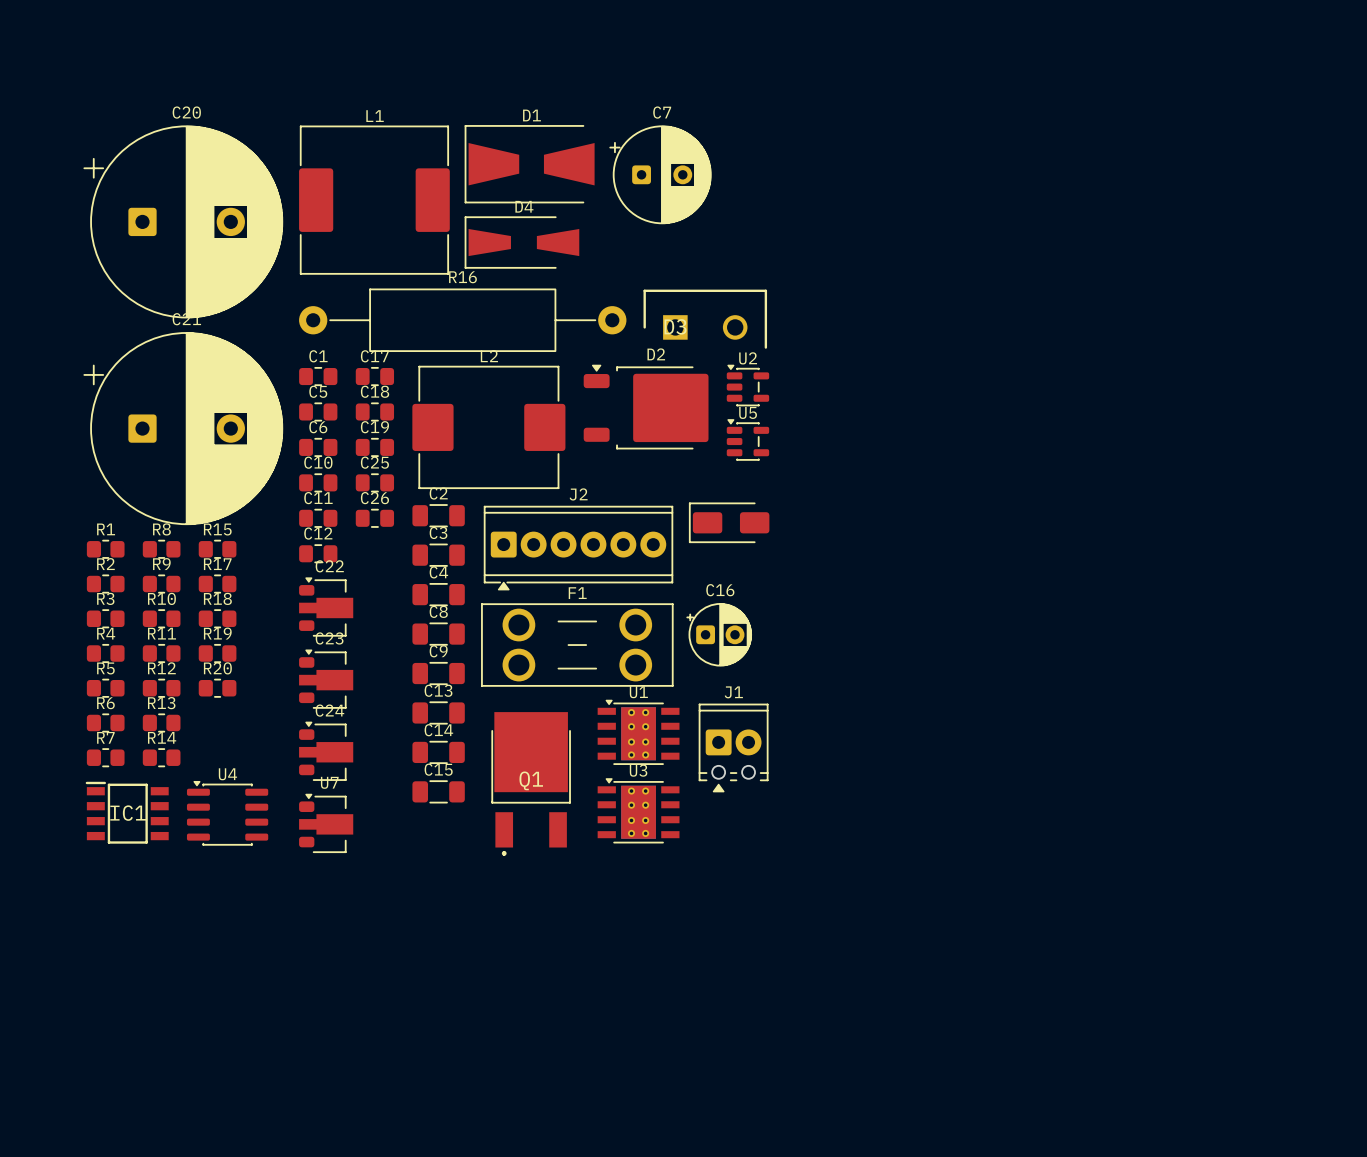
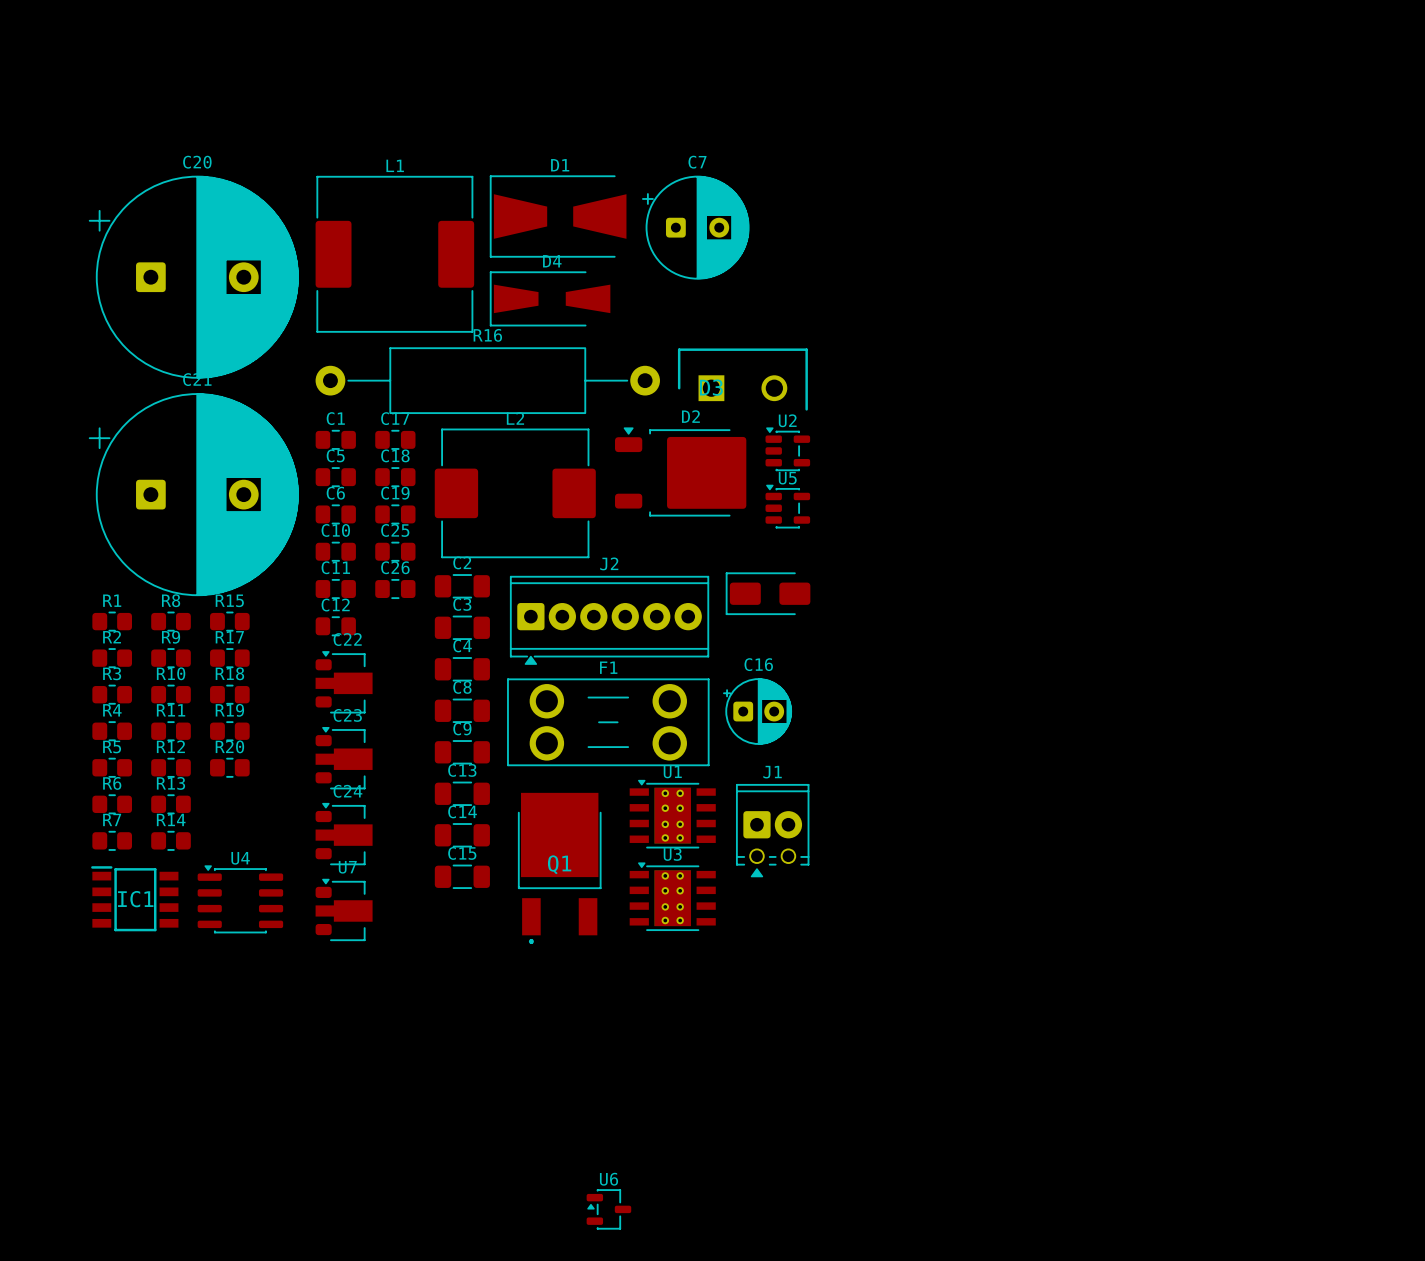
U6: none -> (608, 1209)

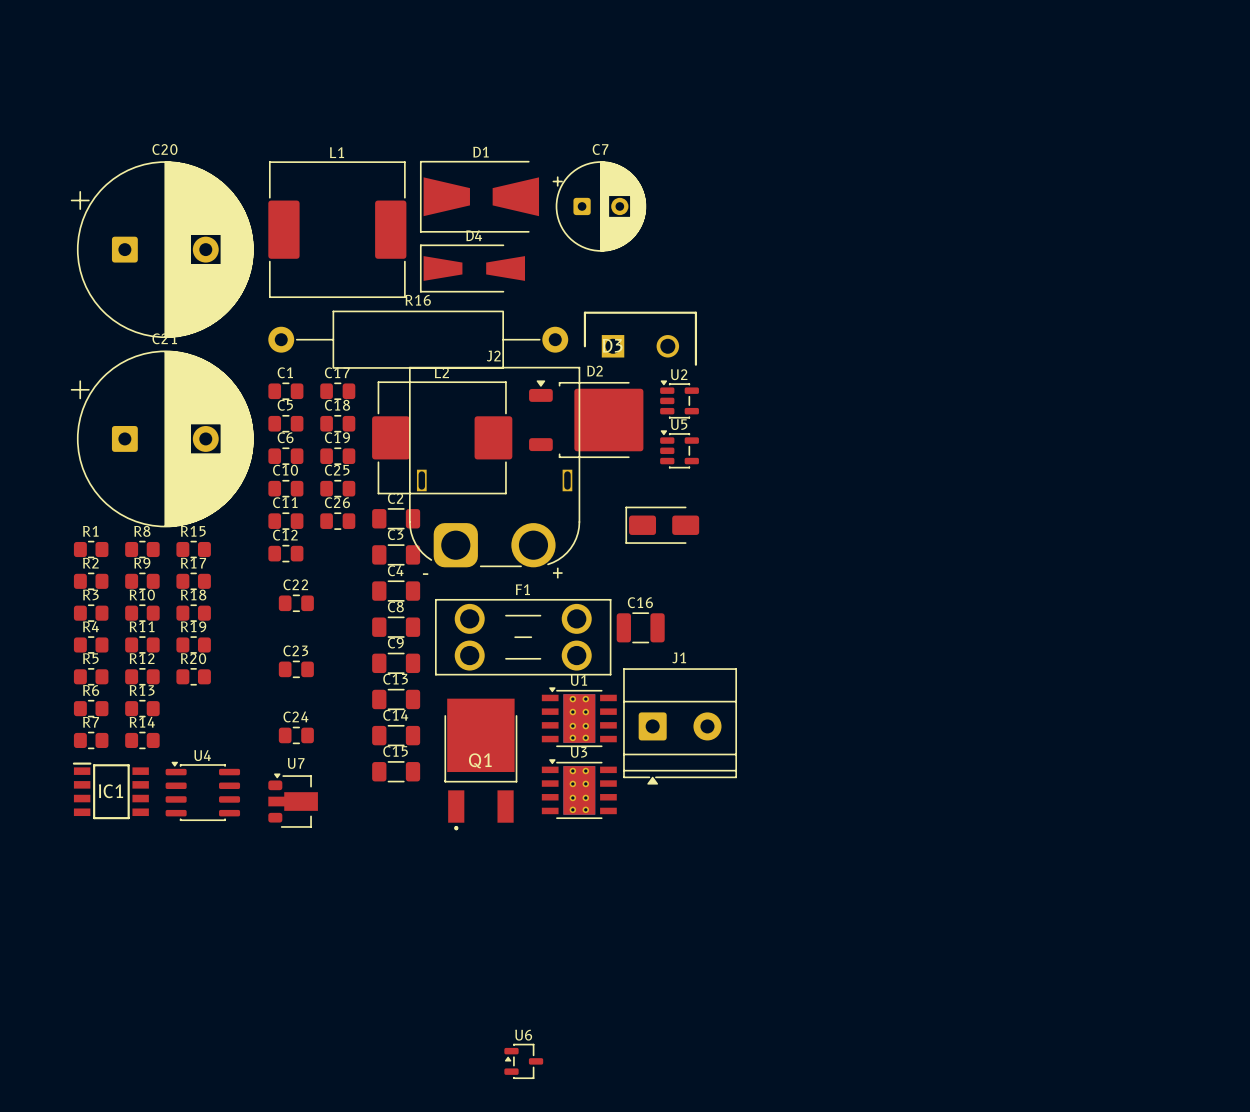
J2 name position: J2 (609, 563) -> J2 (493, 356)
J2 footprint: [510, 576, 710, 665] -> [409, 366, 581, 568]
C22 footprint: [315, 651, 373, 714] -> [278, 594, 314, 612]
C16 footprint: [723, 678, 792, 745] -> [616, 612, 665, 644]
C23 footprint: [315, 727, 373, 790] -> [278, 660, 314, 678]
J1 footprint: [736, 784, 810, 878] -> [623, 668, 737, 785]
C24 footprint: [315, 802, 373, 866] -> [278, 726, 314, 745]

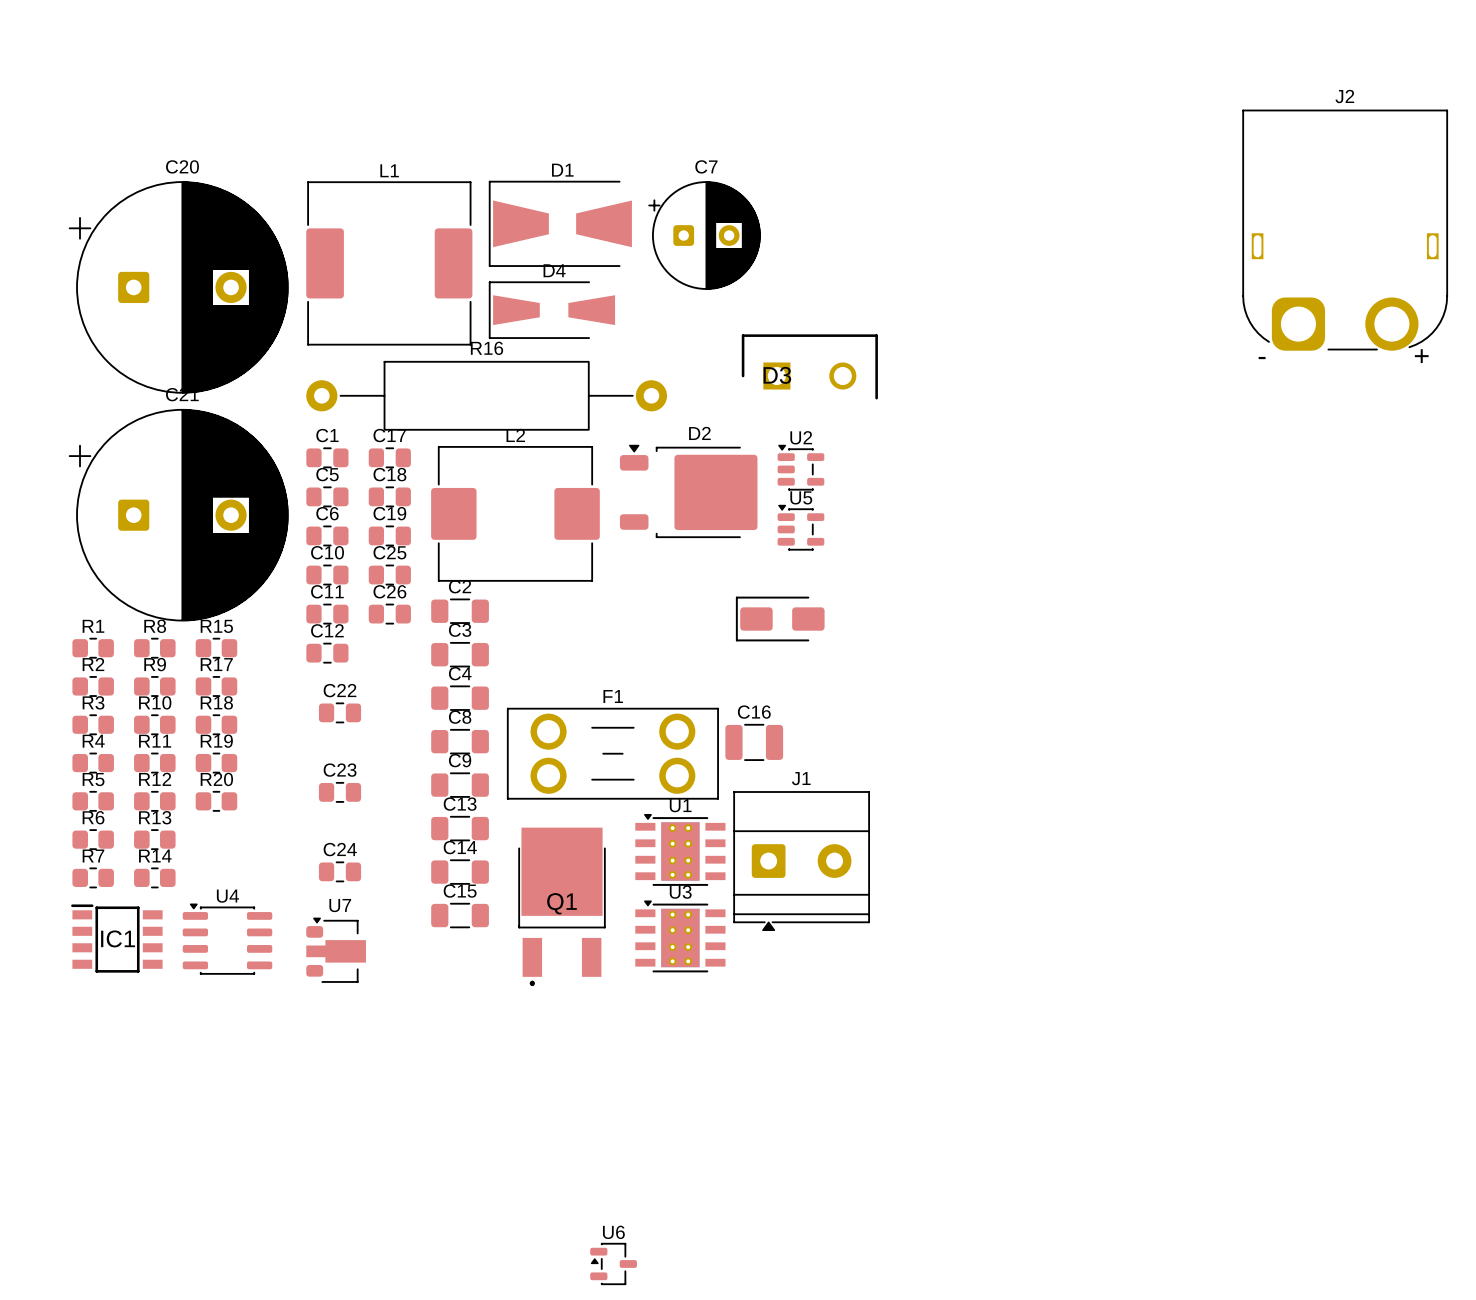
D3 position: (640, 338) -> (809, 366)
J2 position: (494, 467) -> (1345, 230)

